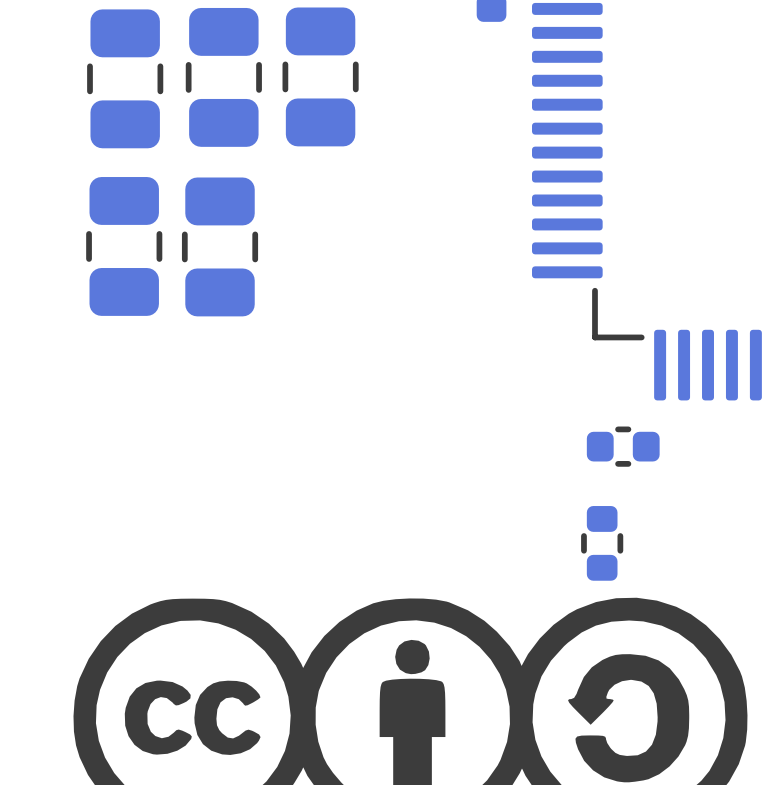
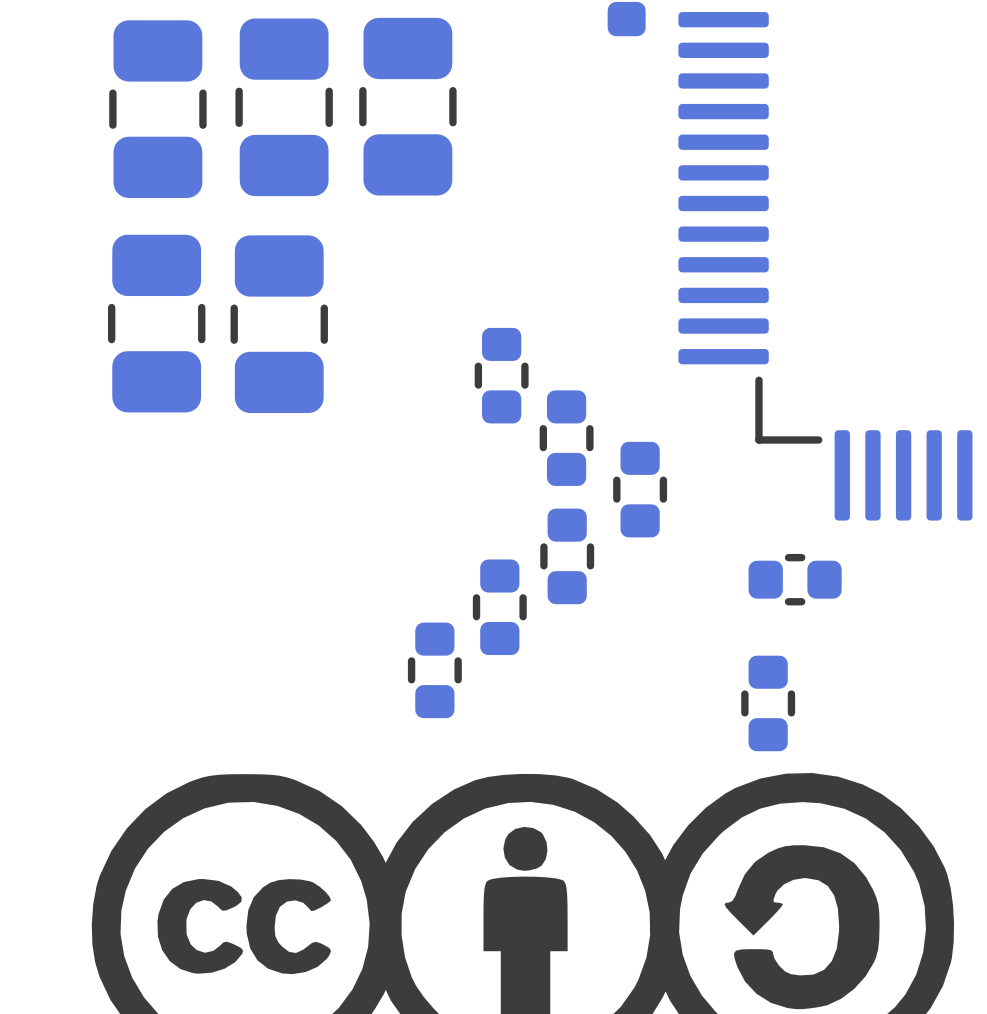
part: none -> (501, 375)
part: none -> (566, 438)
part: none -> (640, 489)
part: none -> (567, 556)
part: none -> (499, 607)
part: none -> (434, 670)

